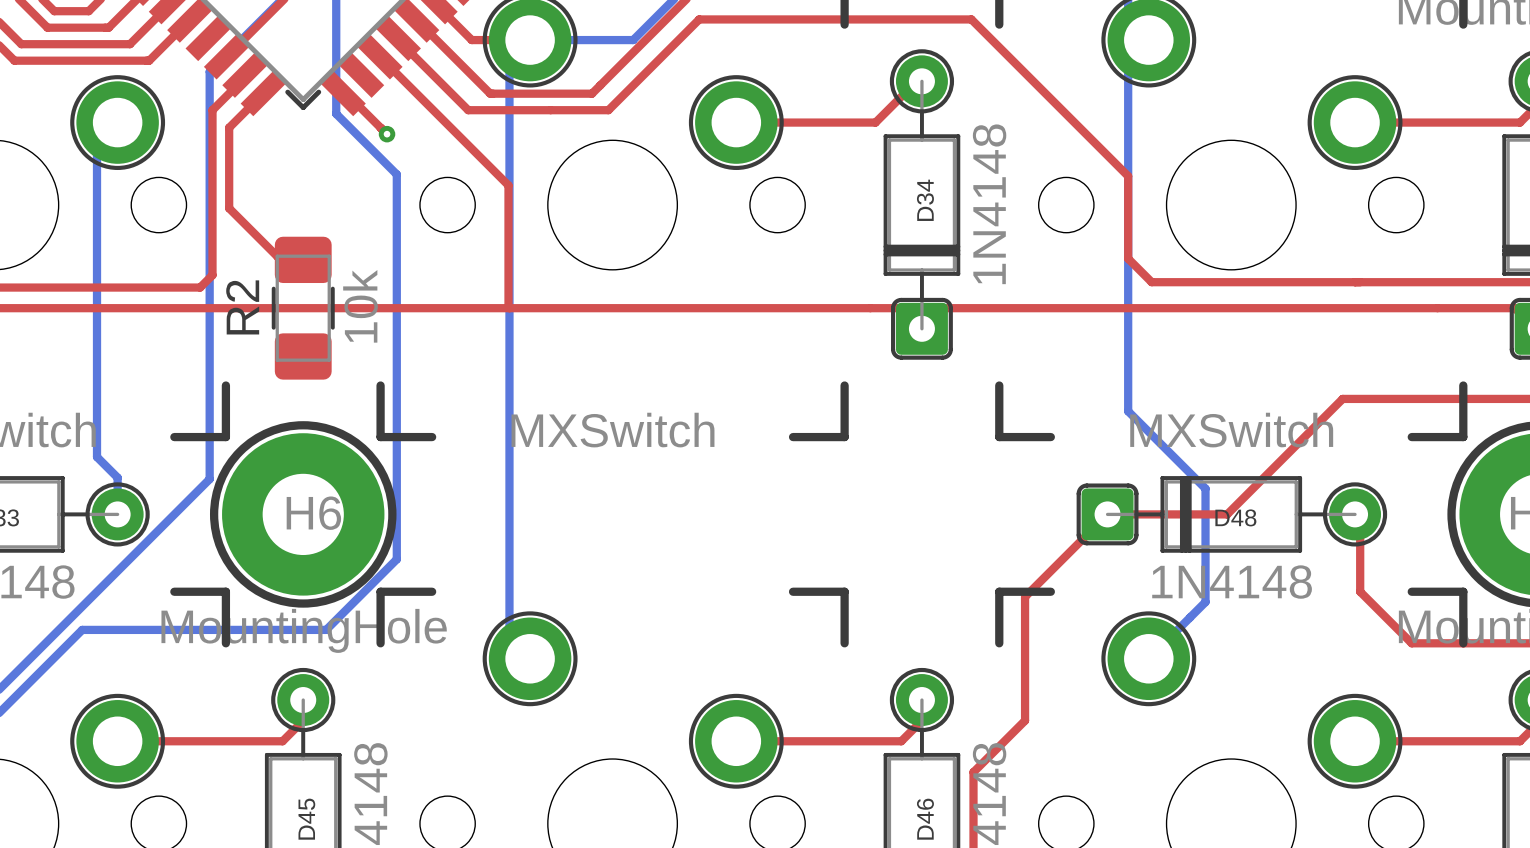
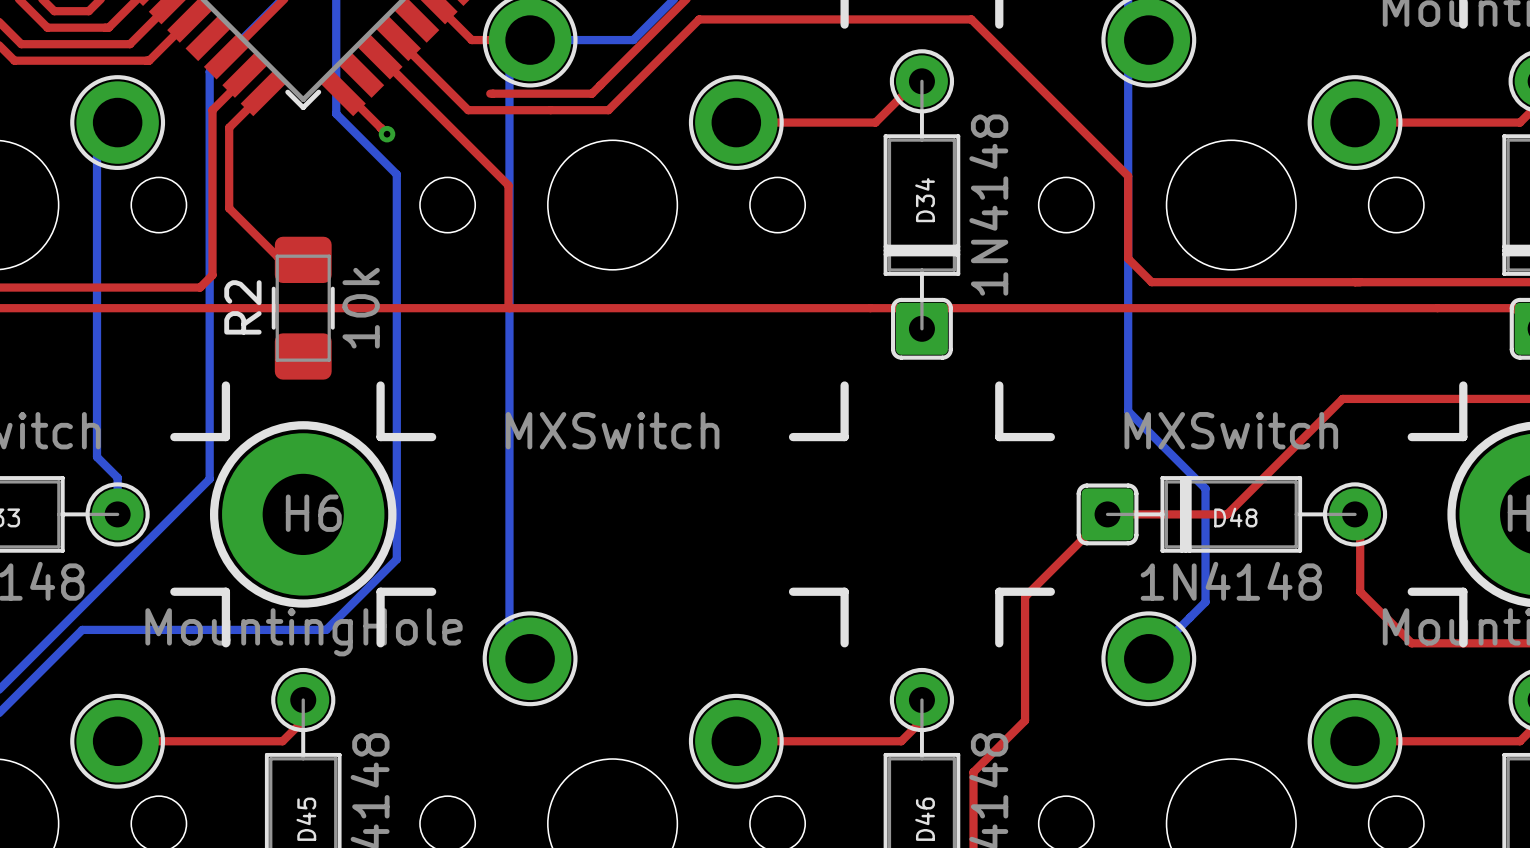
top track: (415, 19) (490, 93) -> none

